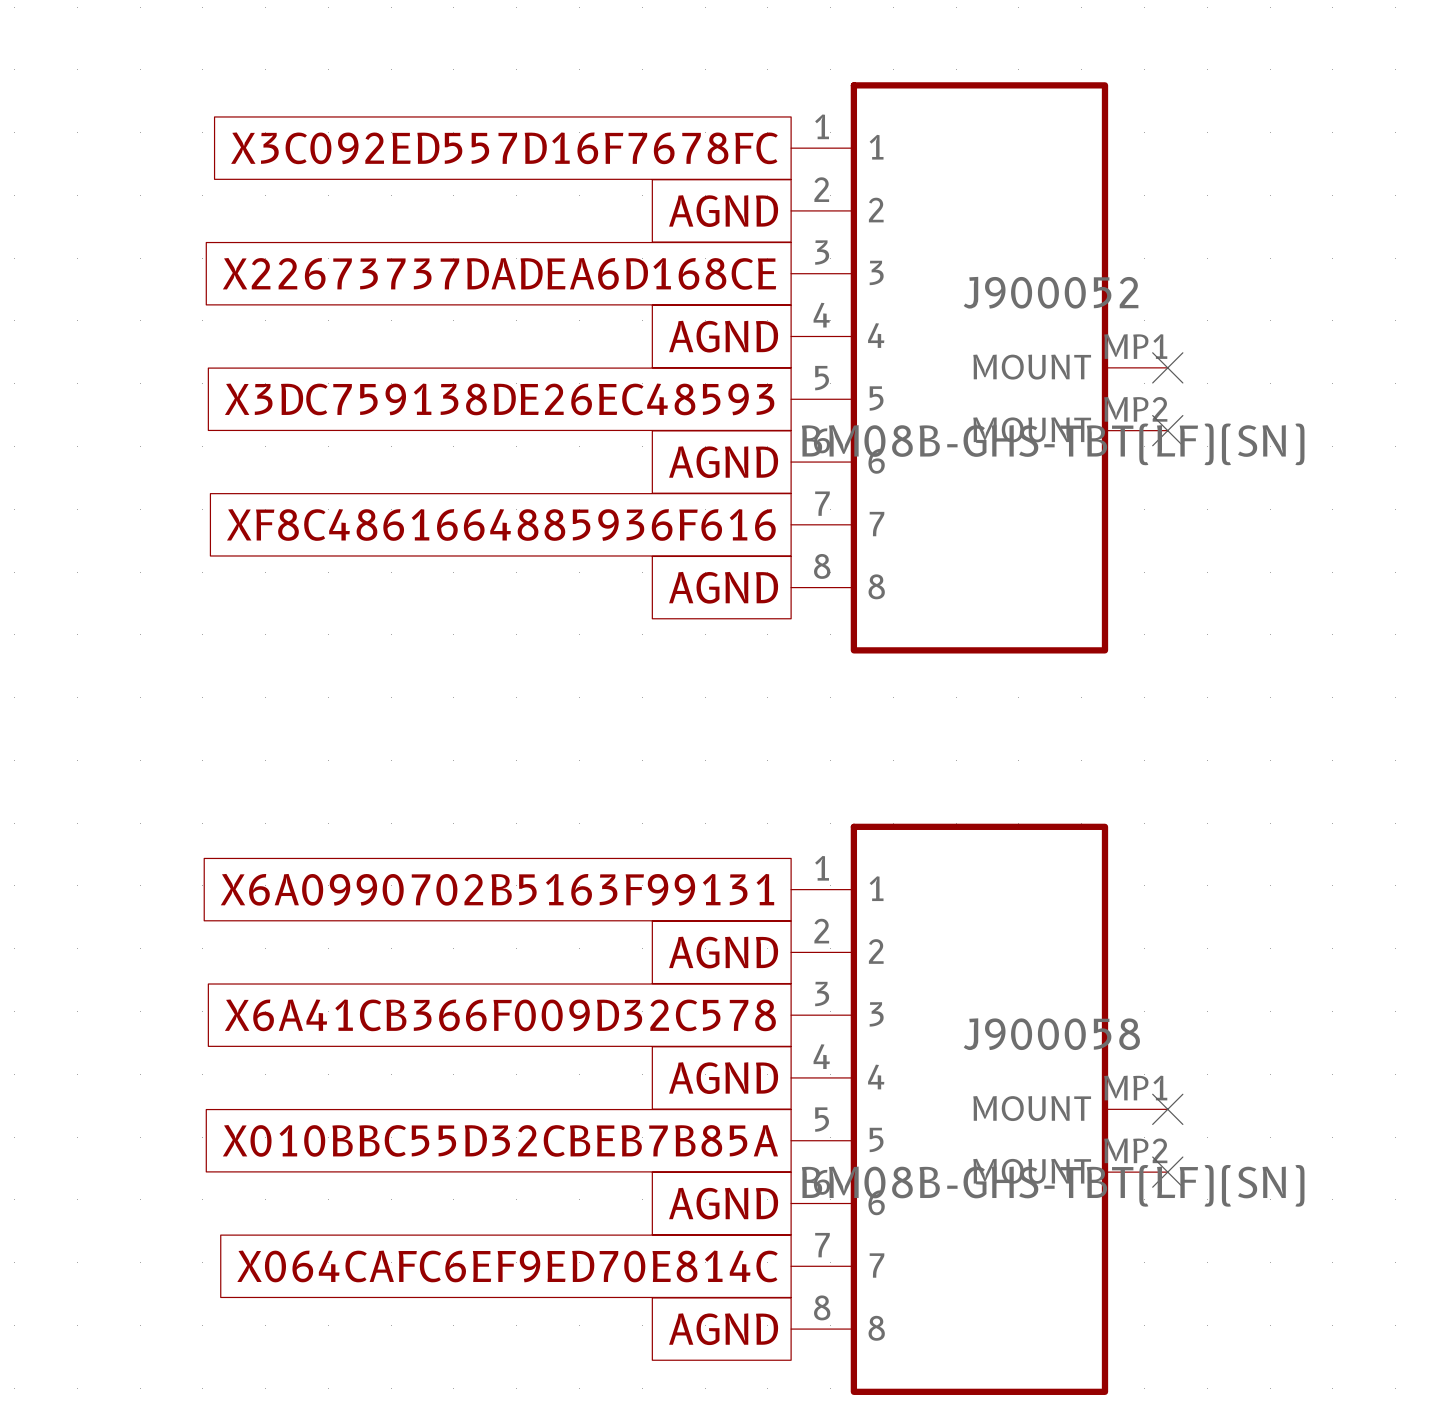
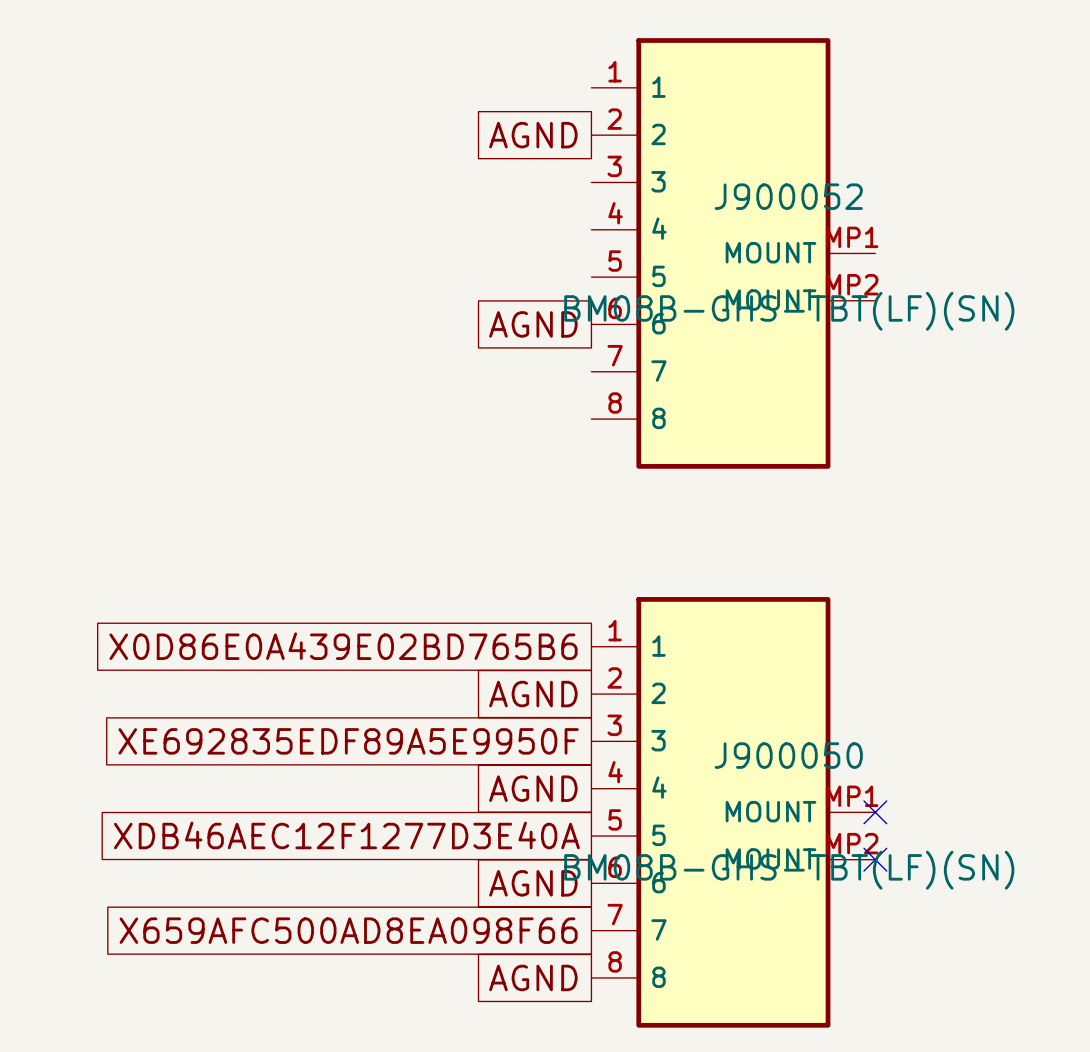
global label: X3C092ED557D16F7678FC (504, 148) -> none
global label: X22673737DADEA6D168CE (499, 273) -> none
global label: AGND (723, 336) -> none
no-connect mark: (1167, 367) -> none
global label: X3DC759138DE26EC48593 (499, 399) -> none
no-connect mark: (1167, 430) -> none
global label: XF8C4861664885936F616 (501, 524) -> none
global label: AGND (723, 587) -> none
global label: X6A0990702B5163F99131 (497, 889) -> X0D86E0A439E02BD765B6 (343, 646)
global label: X6A41CB366F009D32C578 (500, 1015) -> XE692835EDF89A5E9950F (348, 741)
J900058 name: J900058 (1051, 1034) -> J900050 (788, 755)
global label: X010BBC55D32CBEB7B85A (500, 1140) -> XDB46AEC12F1277D3E40A (346, 835)
global label: X064CAFC6EF9ED70E814C (507, 1266) -> X659AFC500AD8EA098F66 (348, 930)

